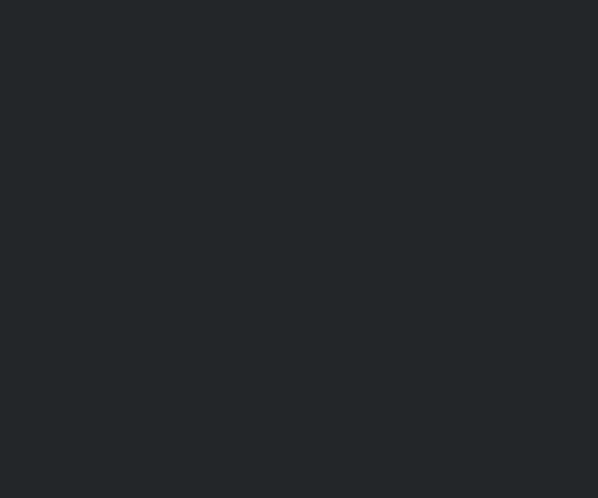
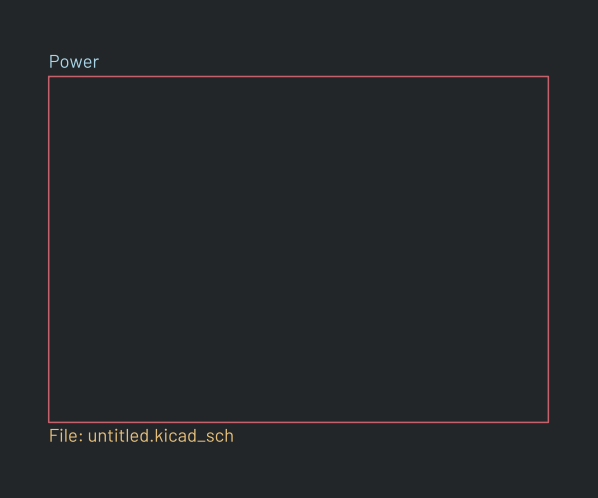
sheet Power: none -> File: untitled.kicad_sch (298, 249)

